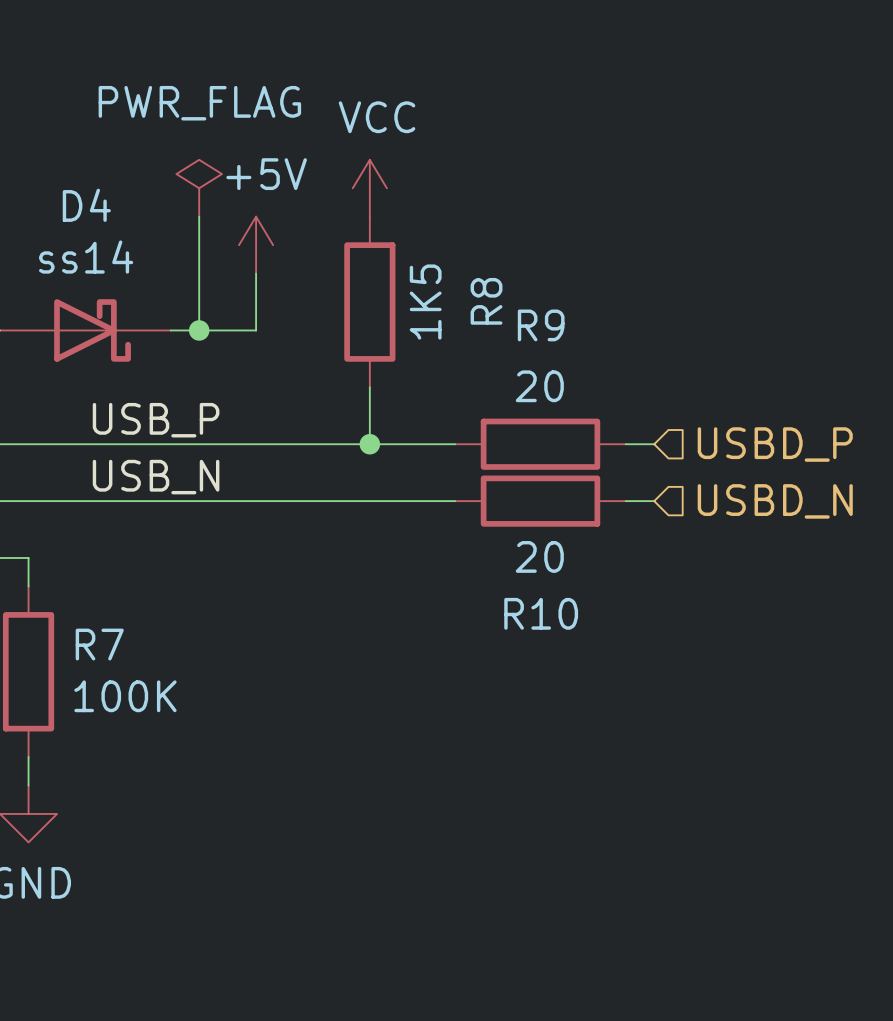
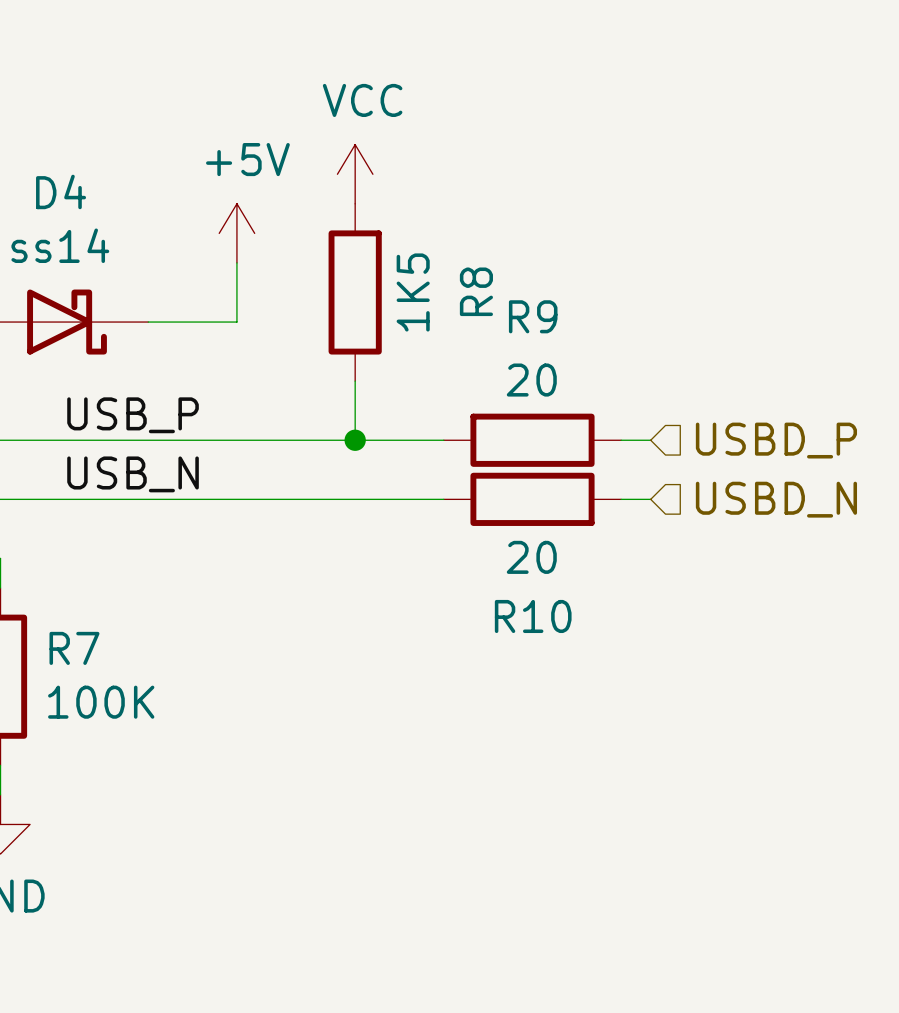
power symbol: PWR_FLAG (199, 188) -> none
wire: (199, 216) (199, 330) -> none
junction: (199, 330) -> none

